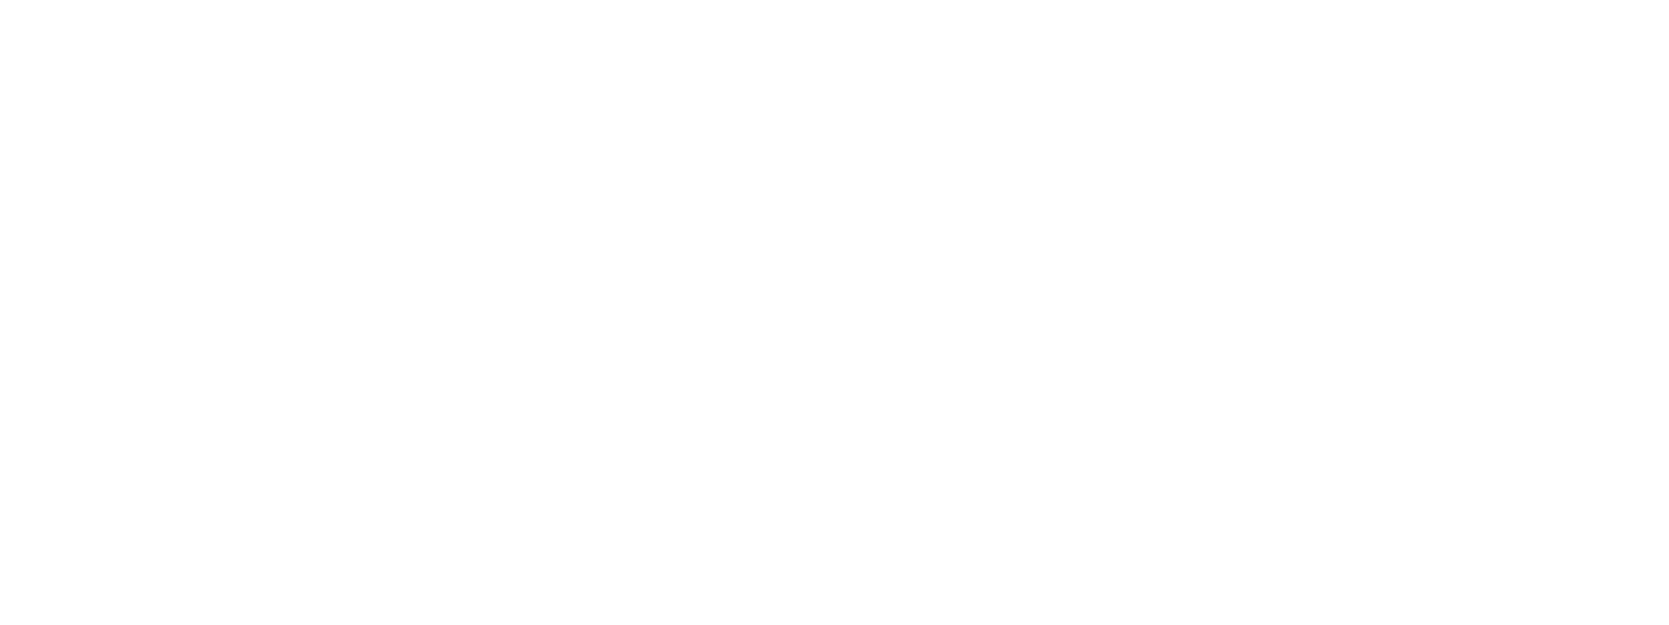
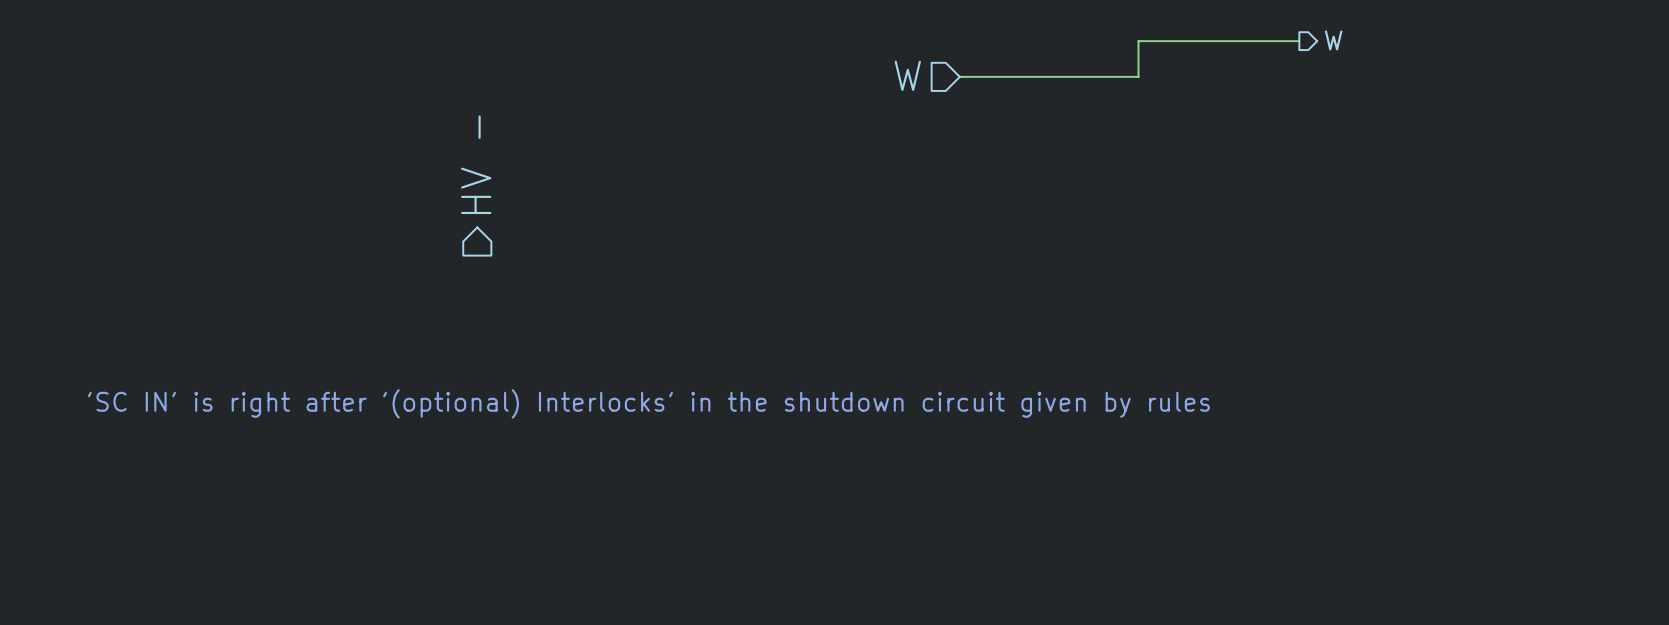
sheet pin: none -> W (1333, 40)
wire: none -> (1299, 41) (1138, 41) (1138, 76) (959, 76)
sheet pin: none -> W (907, 75)
sheet pin: none -> HV - (476, 164)
text: none -> 'SC IN' is right after '(optional) Interlocks' in the shutdown circuit given by rules (648, 403)

